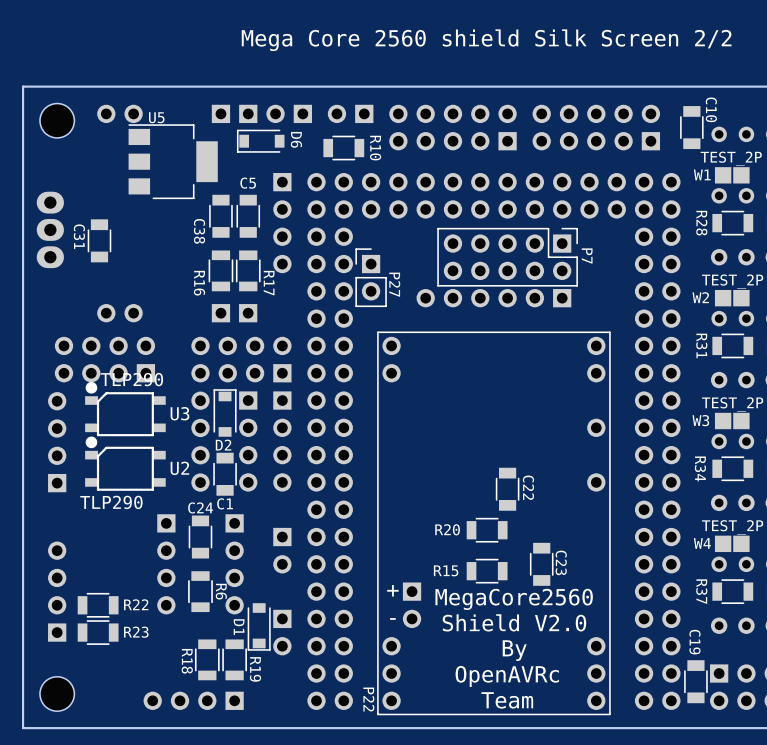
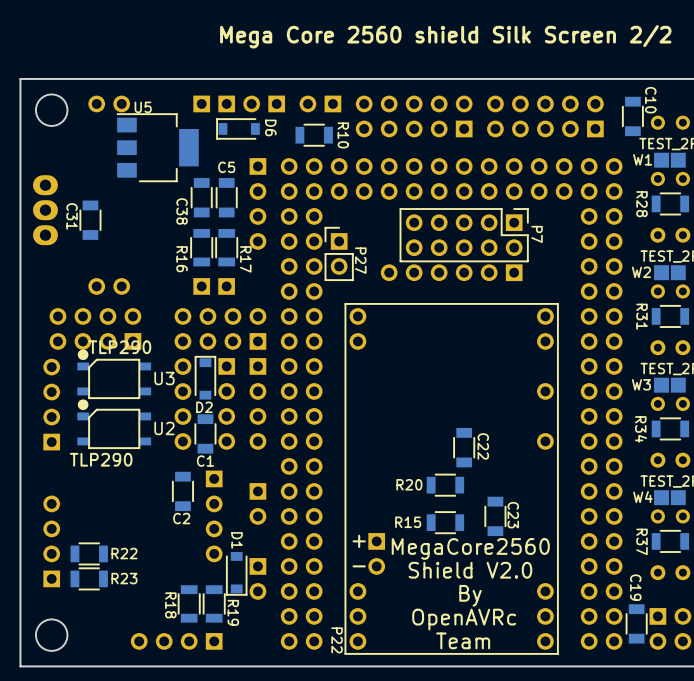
C24 name: C24 (200, 507) -> C2 (181, 518)
part: (166, 564) -> none
R6: (200, 591) -> none
D1 name position: D1 (239, 627) -> D1 (237, 540)

